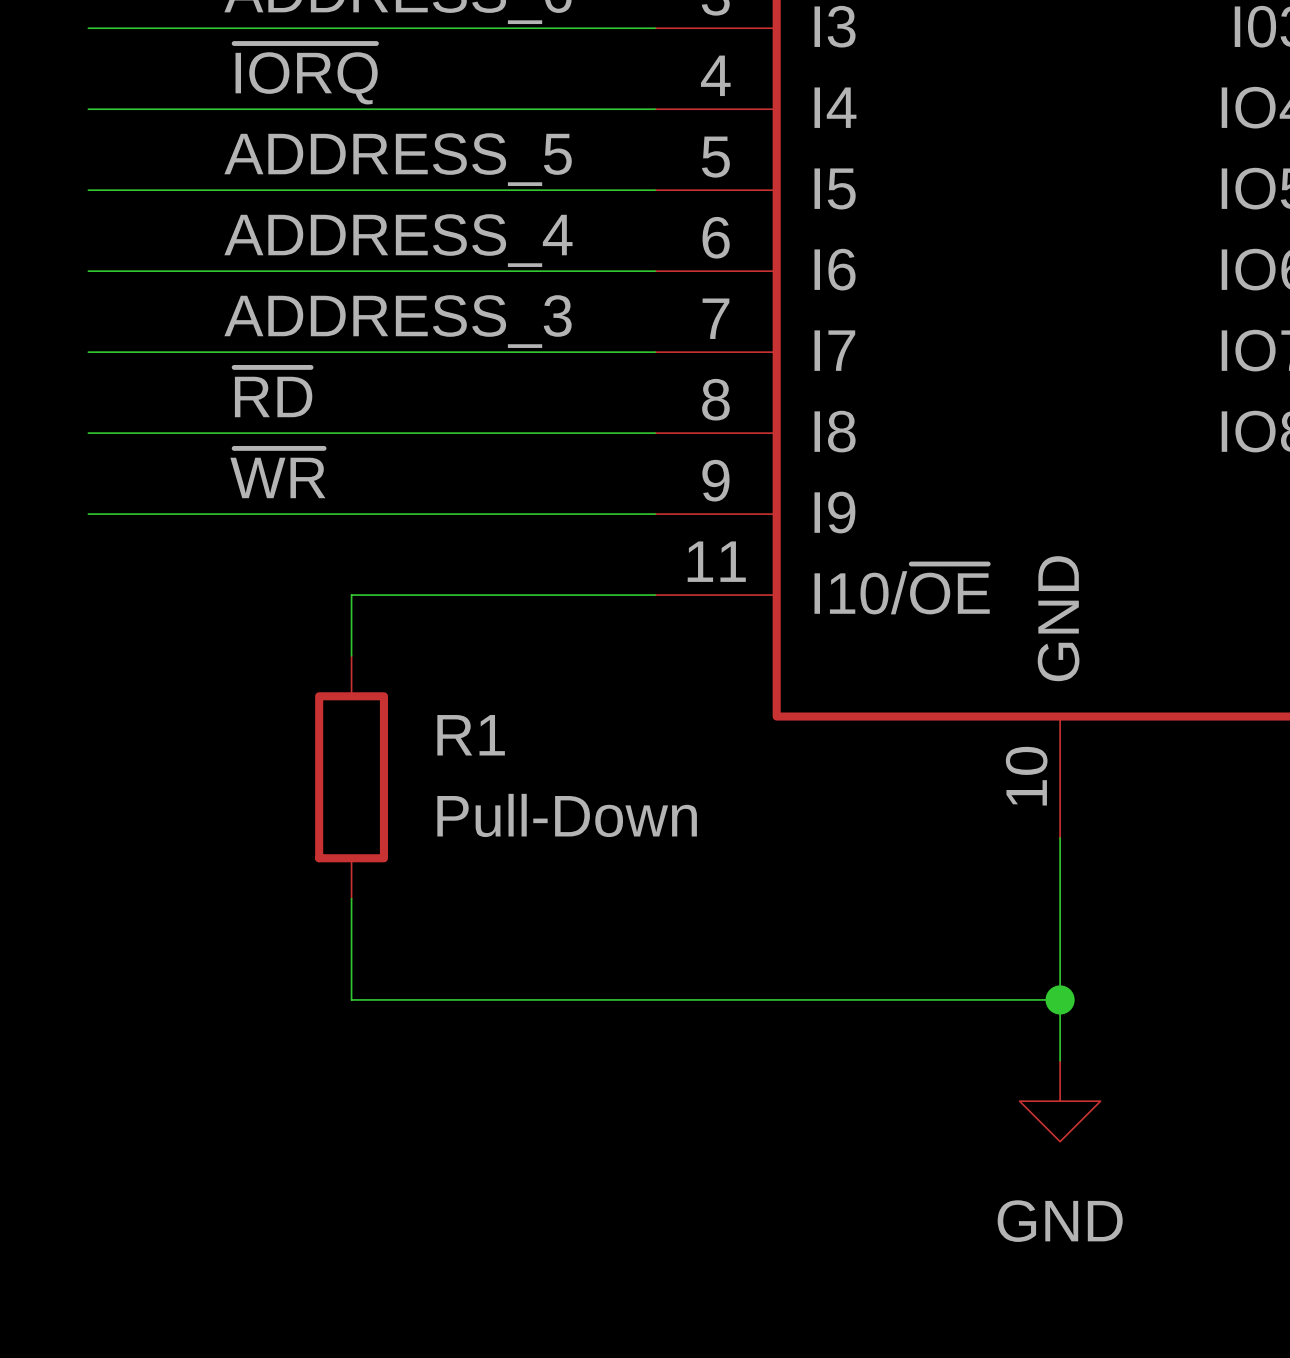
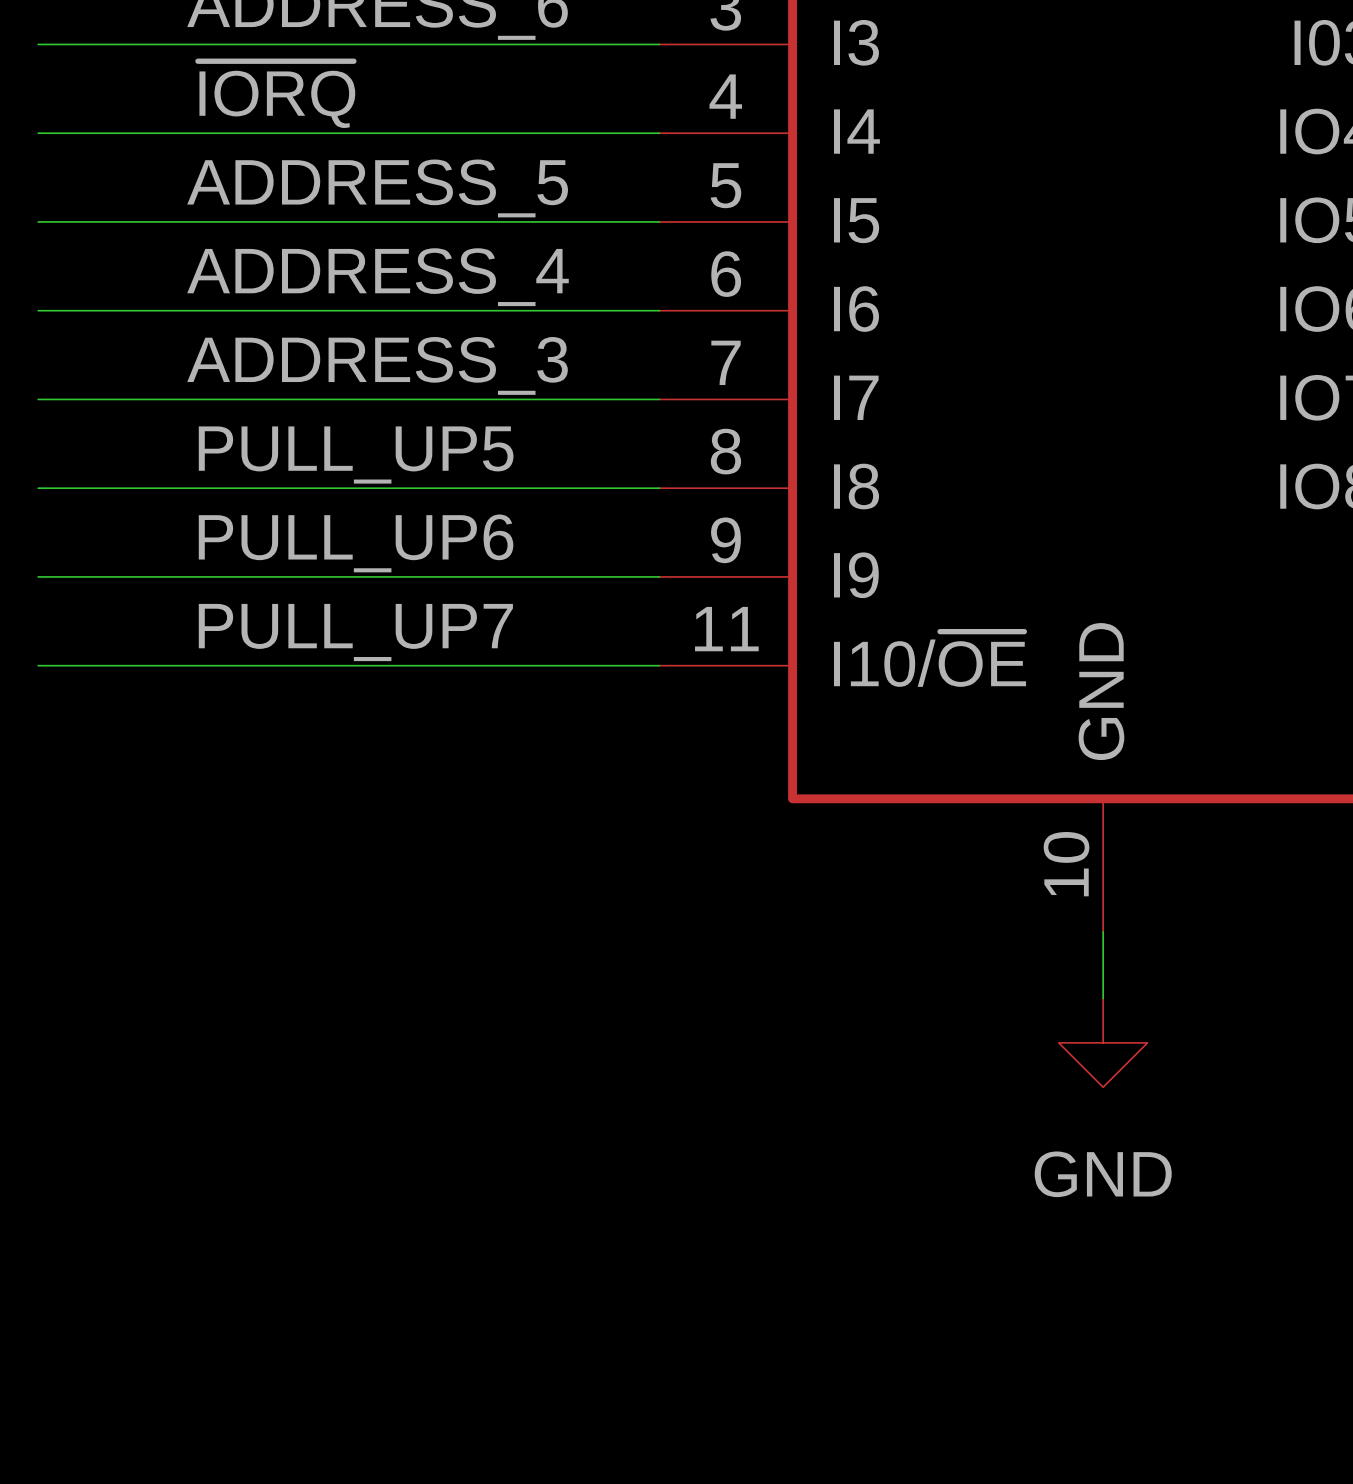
label: ~{RD} (273, 392) -> PULL_UP5 (356, 455)
label: ~{WR} (277, 473) -> PULL_UP6 (356, 543)
label: none -> PULL_UP7 (355, 632)
wire: (351, 595) (351, 655) -> (326, 665) (38, 665)
R1: Pull-Down (351, 777) -> none
wire: (351, 898) (351, 999) (1060, 999) -> none
wire: (1060, 898) (1060, 1060) -> none
junction: (1060, 999) -> none
power symbol position: GND (1060, 1101) -> GND (1103, 1042)

